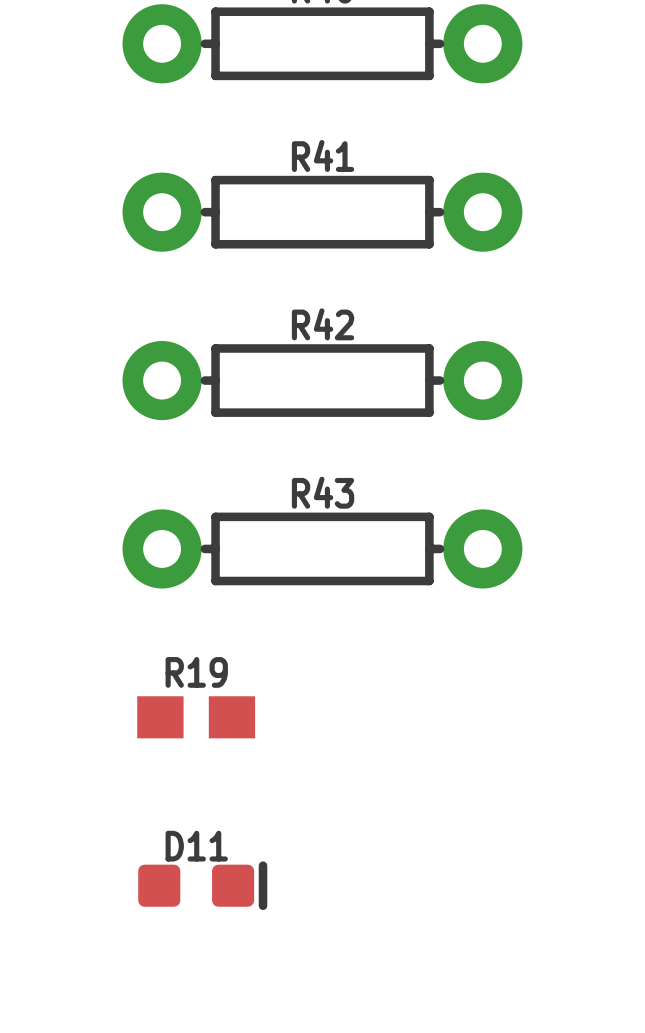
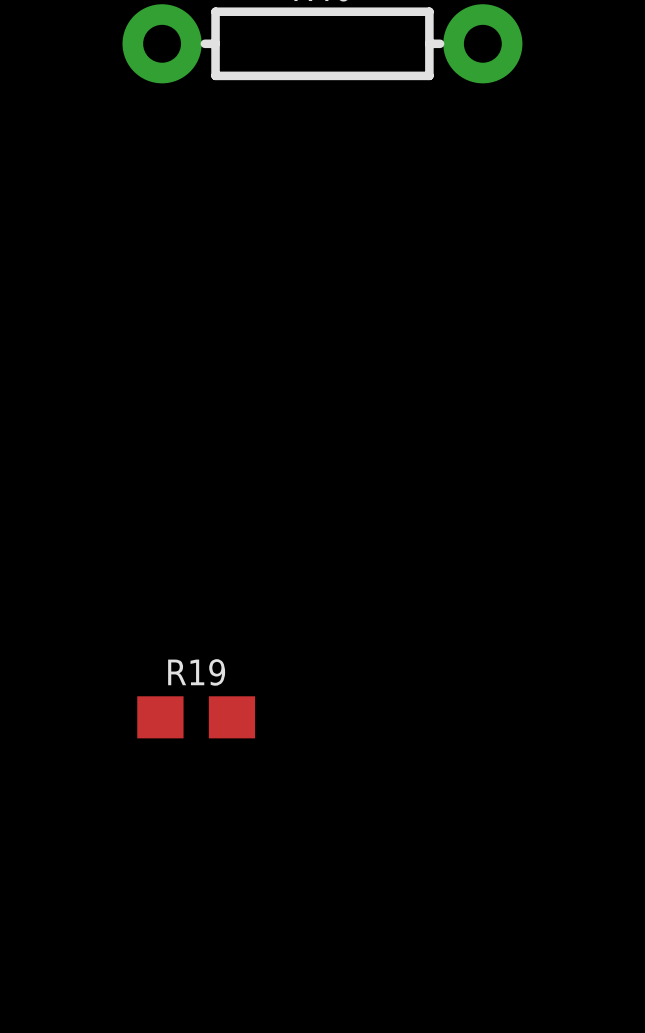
R41: (322, 212) -> none
R42: (322, 380) -> none
R43: (322, 548) -> none
D11: (202, 885) -> none

